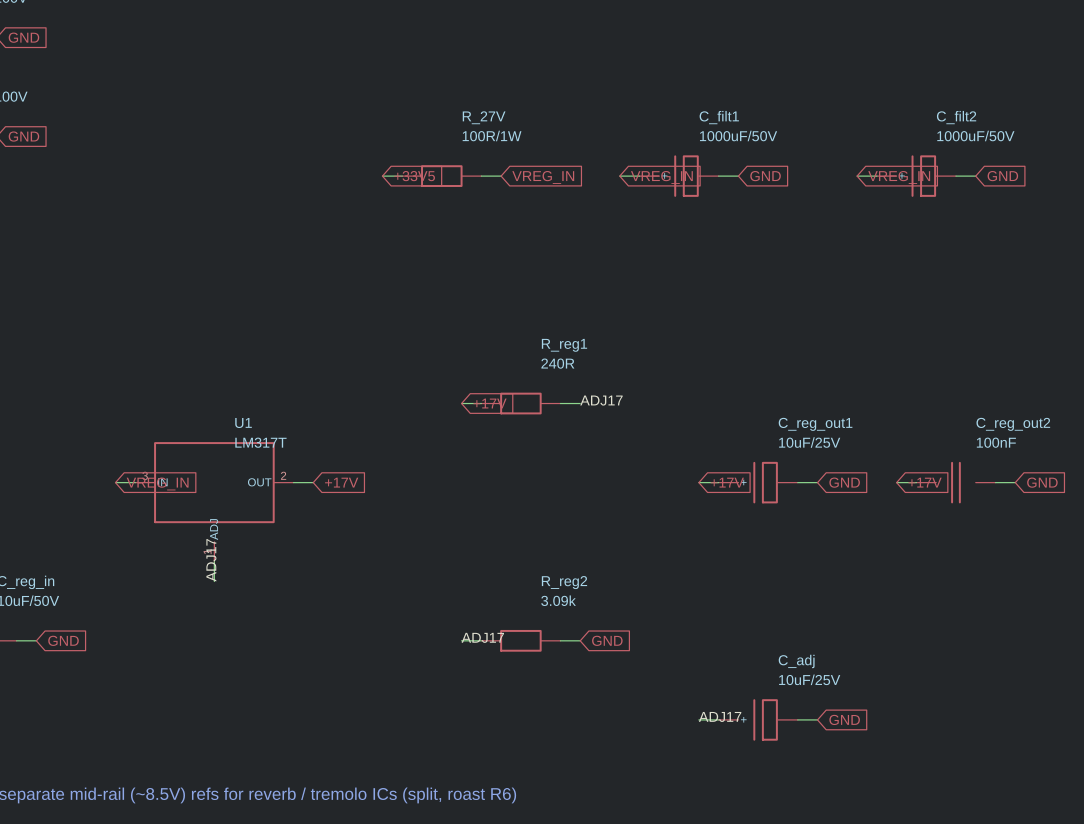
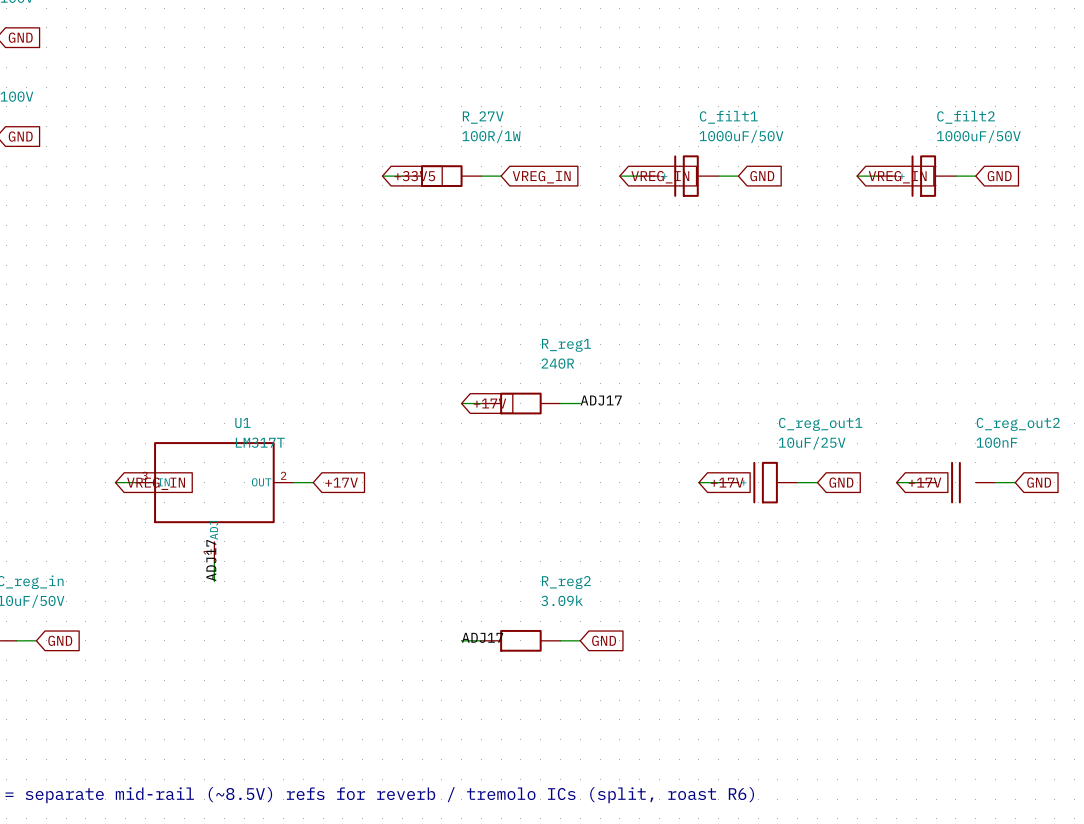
label: ADJ17 (720, 716) -> none
wire: (698, 719) (718, 719) -> none
C_adj: 10uF/25V (758, 719) -> none
wire: (797, 719) (817, 719) -> none
global label: GND (844, 719) -> none

